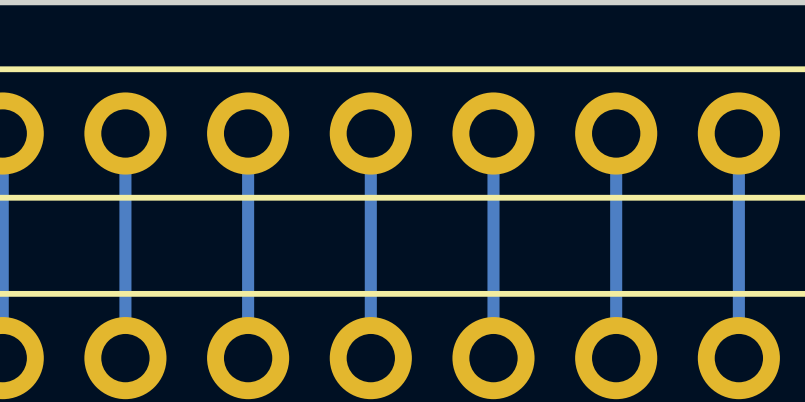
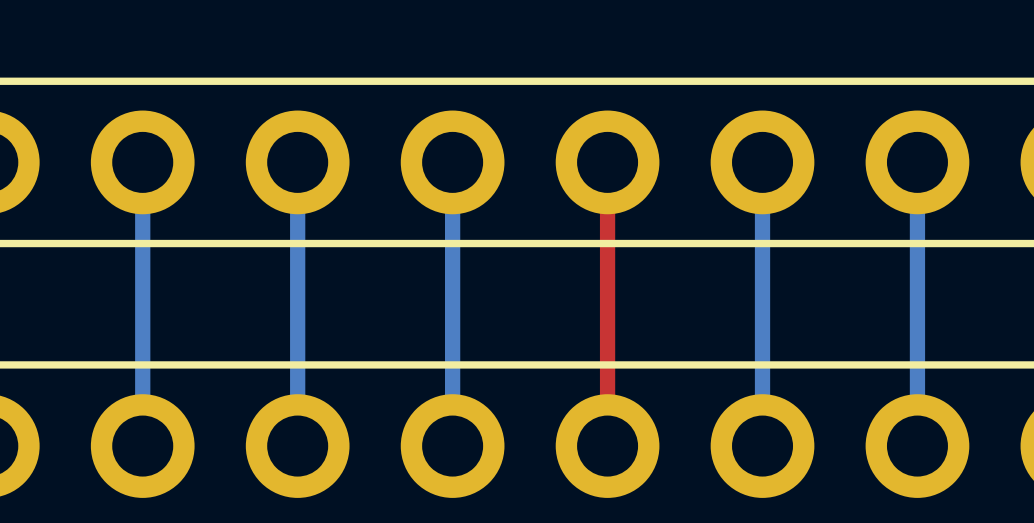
bottom track: (493, 133) (493, 358) -> none
top track: none -> (607, 162) (607, 446)

